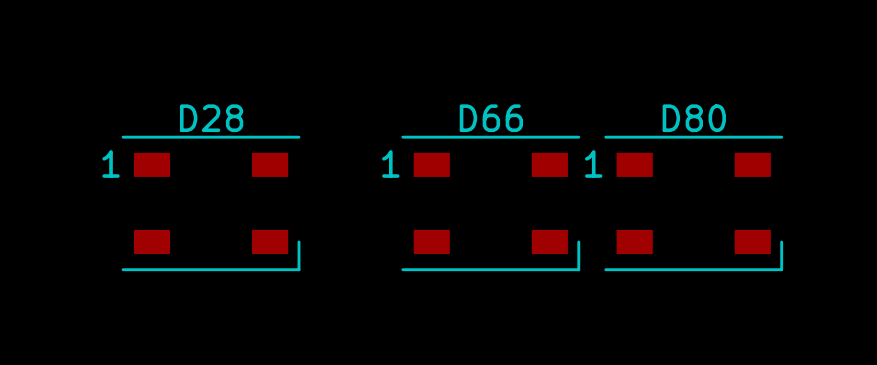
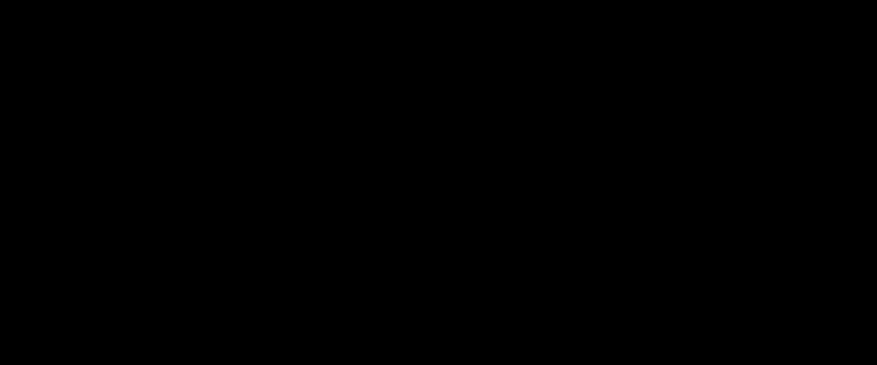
D28: (211, 203) -> none
D66: (490, 203) -> none
D80: (693, 203) -> none

